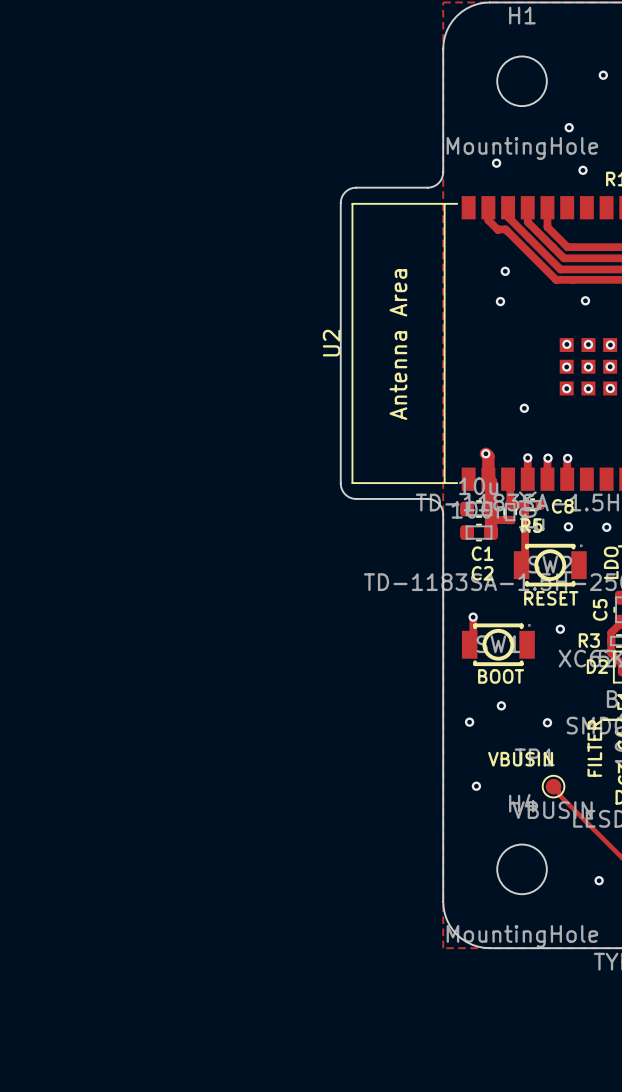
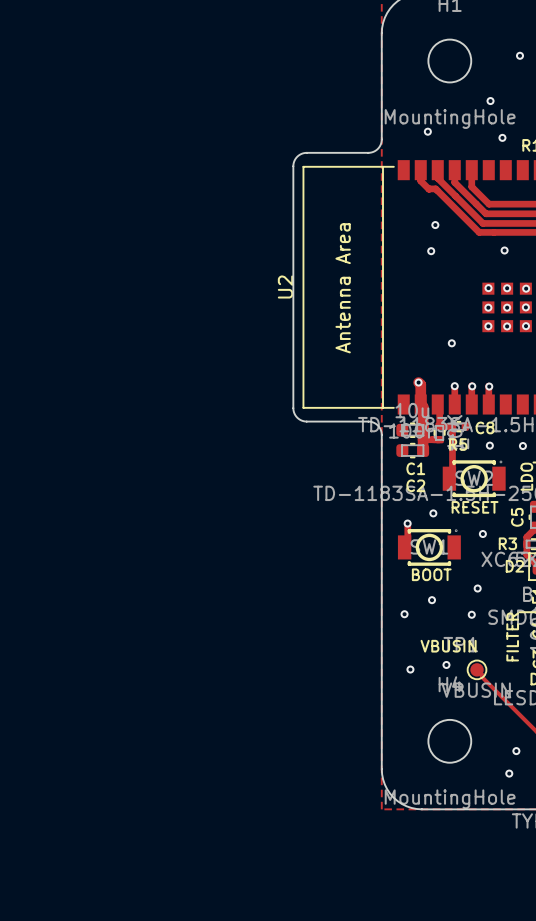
via: none -> (433, 513)
via: none -> (477, 588)
via: none -> (446, 664)
via: none -> (509, 773)

